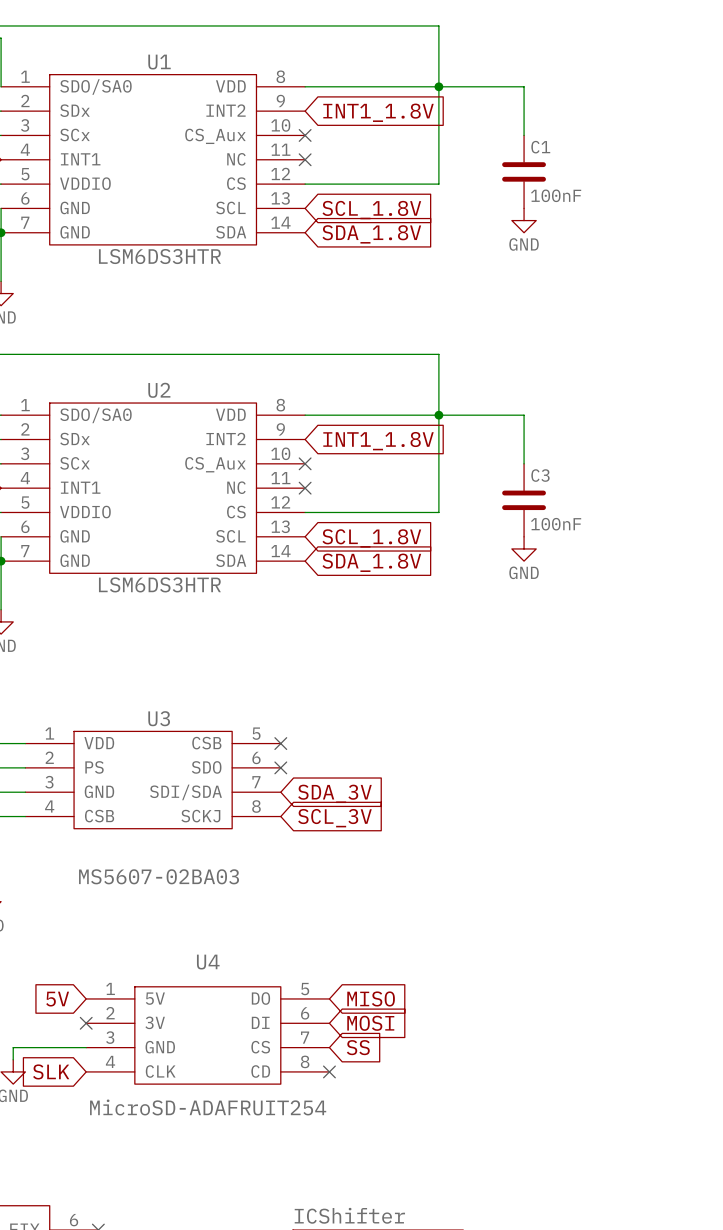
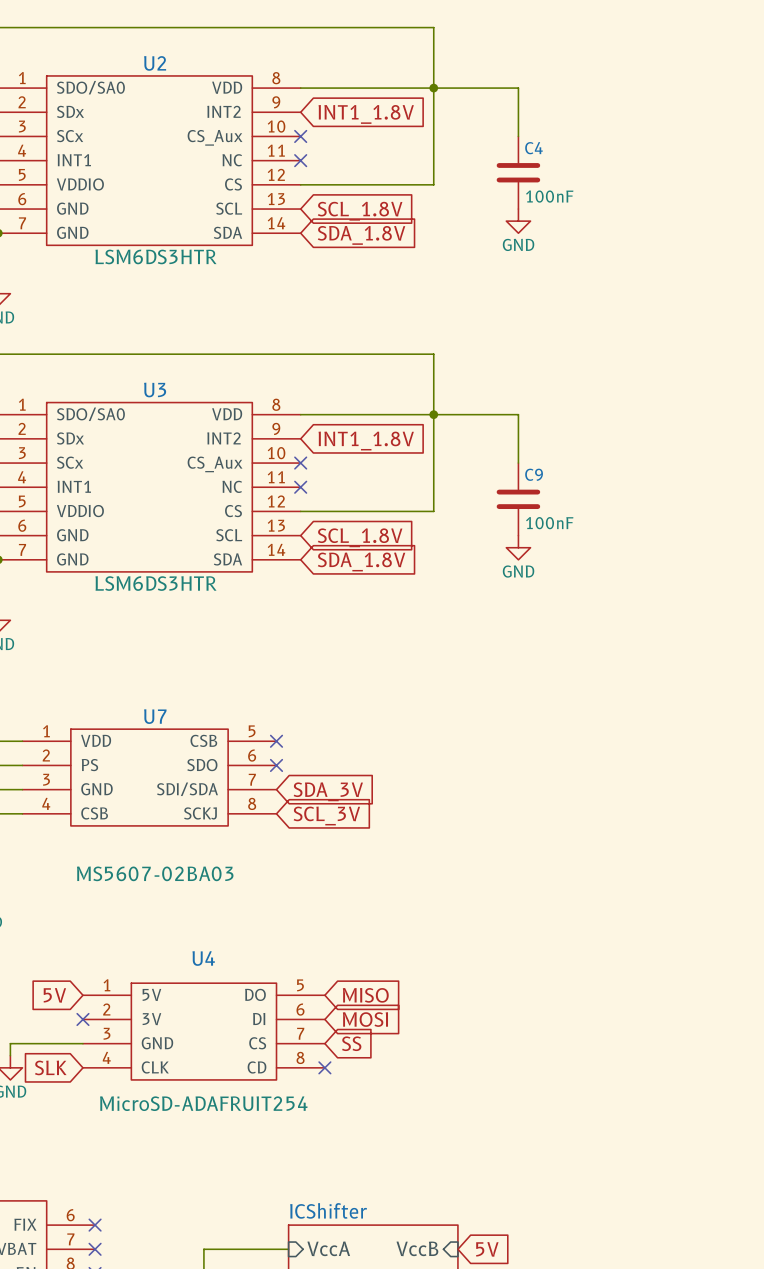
U1 name: U1 (159, 62) -> U2 (155, 63)
C1 name: C1 (540, 147) -> C4 (533, 148)
U2 name: U2 (159, 390) -> U3 (155, 390)
C3 name: C3 (540, 475) -> C9 (534, 474)
U3 name: U3 (159, 718) -> U7 (155, 716)

